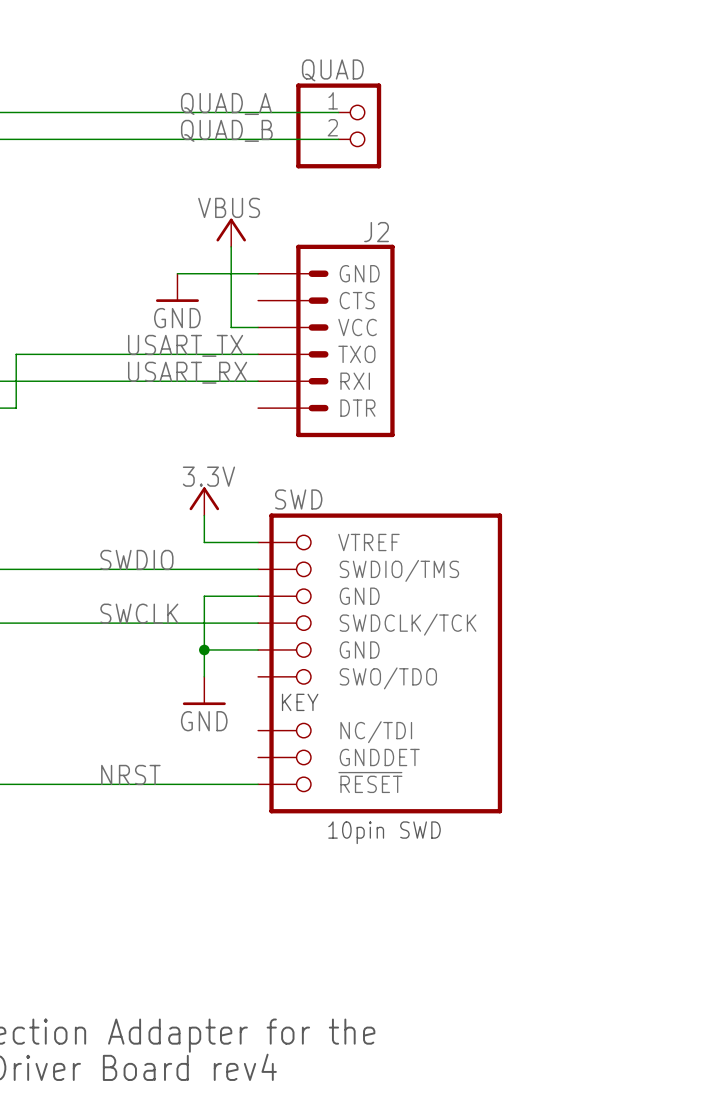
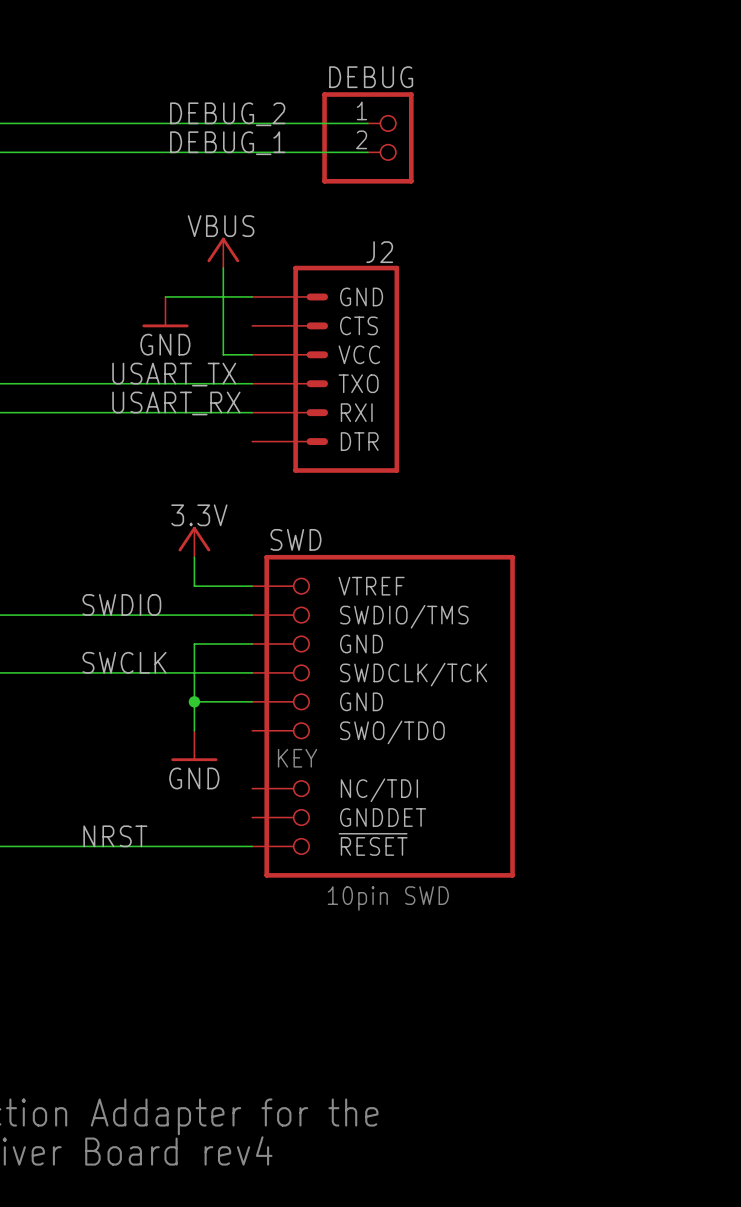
label: QUAD_A (226, 103) -> DEBUG_2 (227, 114)
wire: none -> (339, 123) (367, 123)
QUAD: (338, 125) -> none
DEBUG: none -> (367, 137)
label: QUAD_B (226, 130) -> DEBUG_1 (227, 143)
wire: none -> (339, 152) (367, 152)

